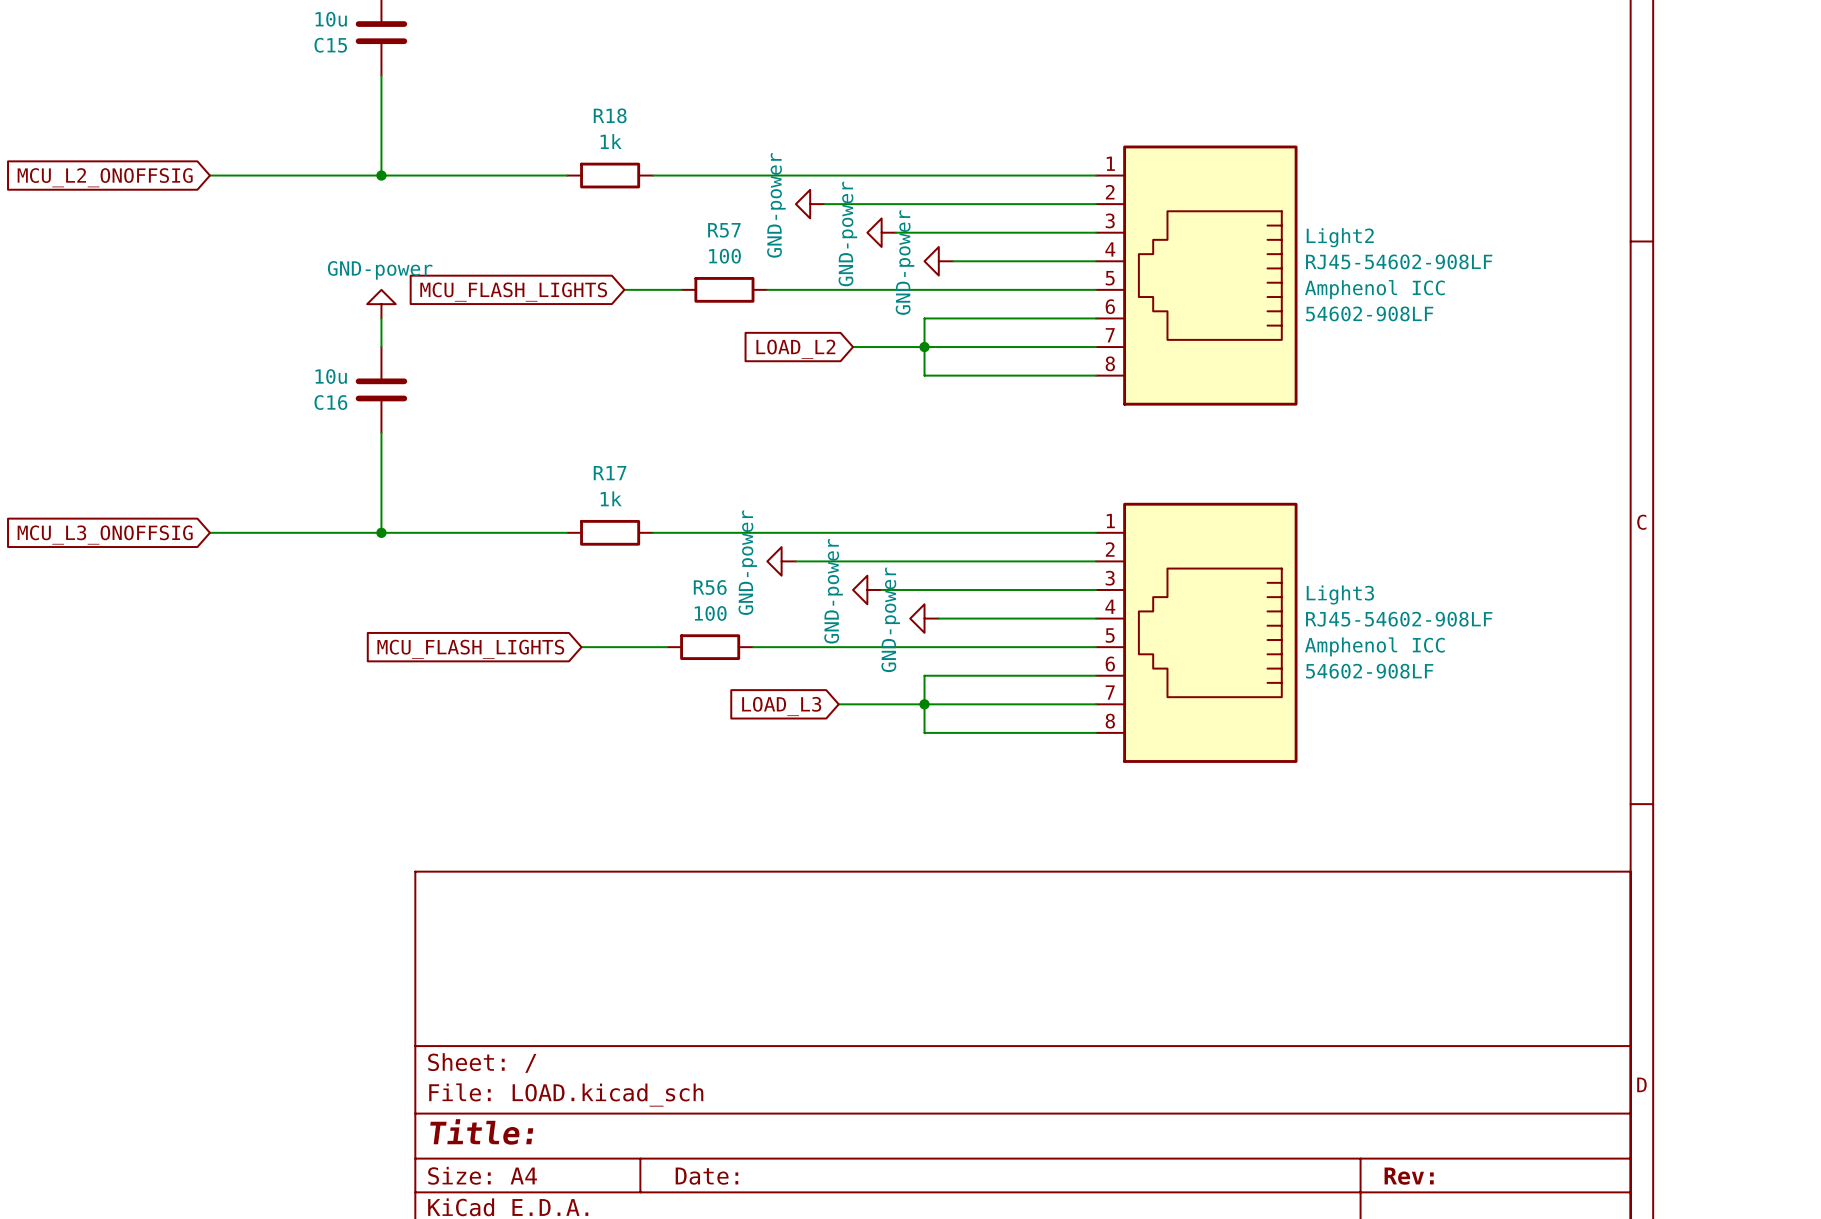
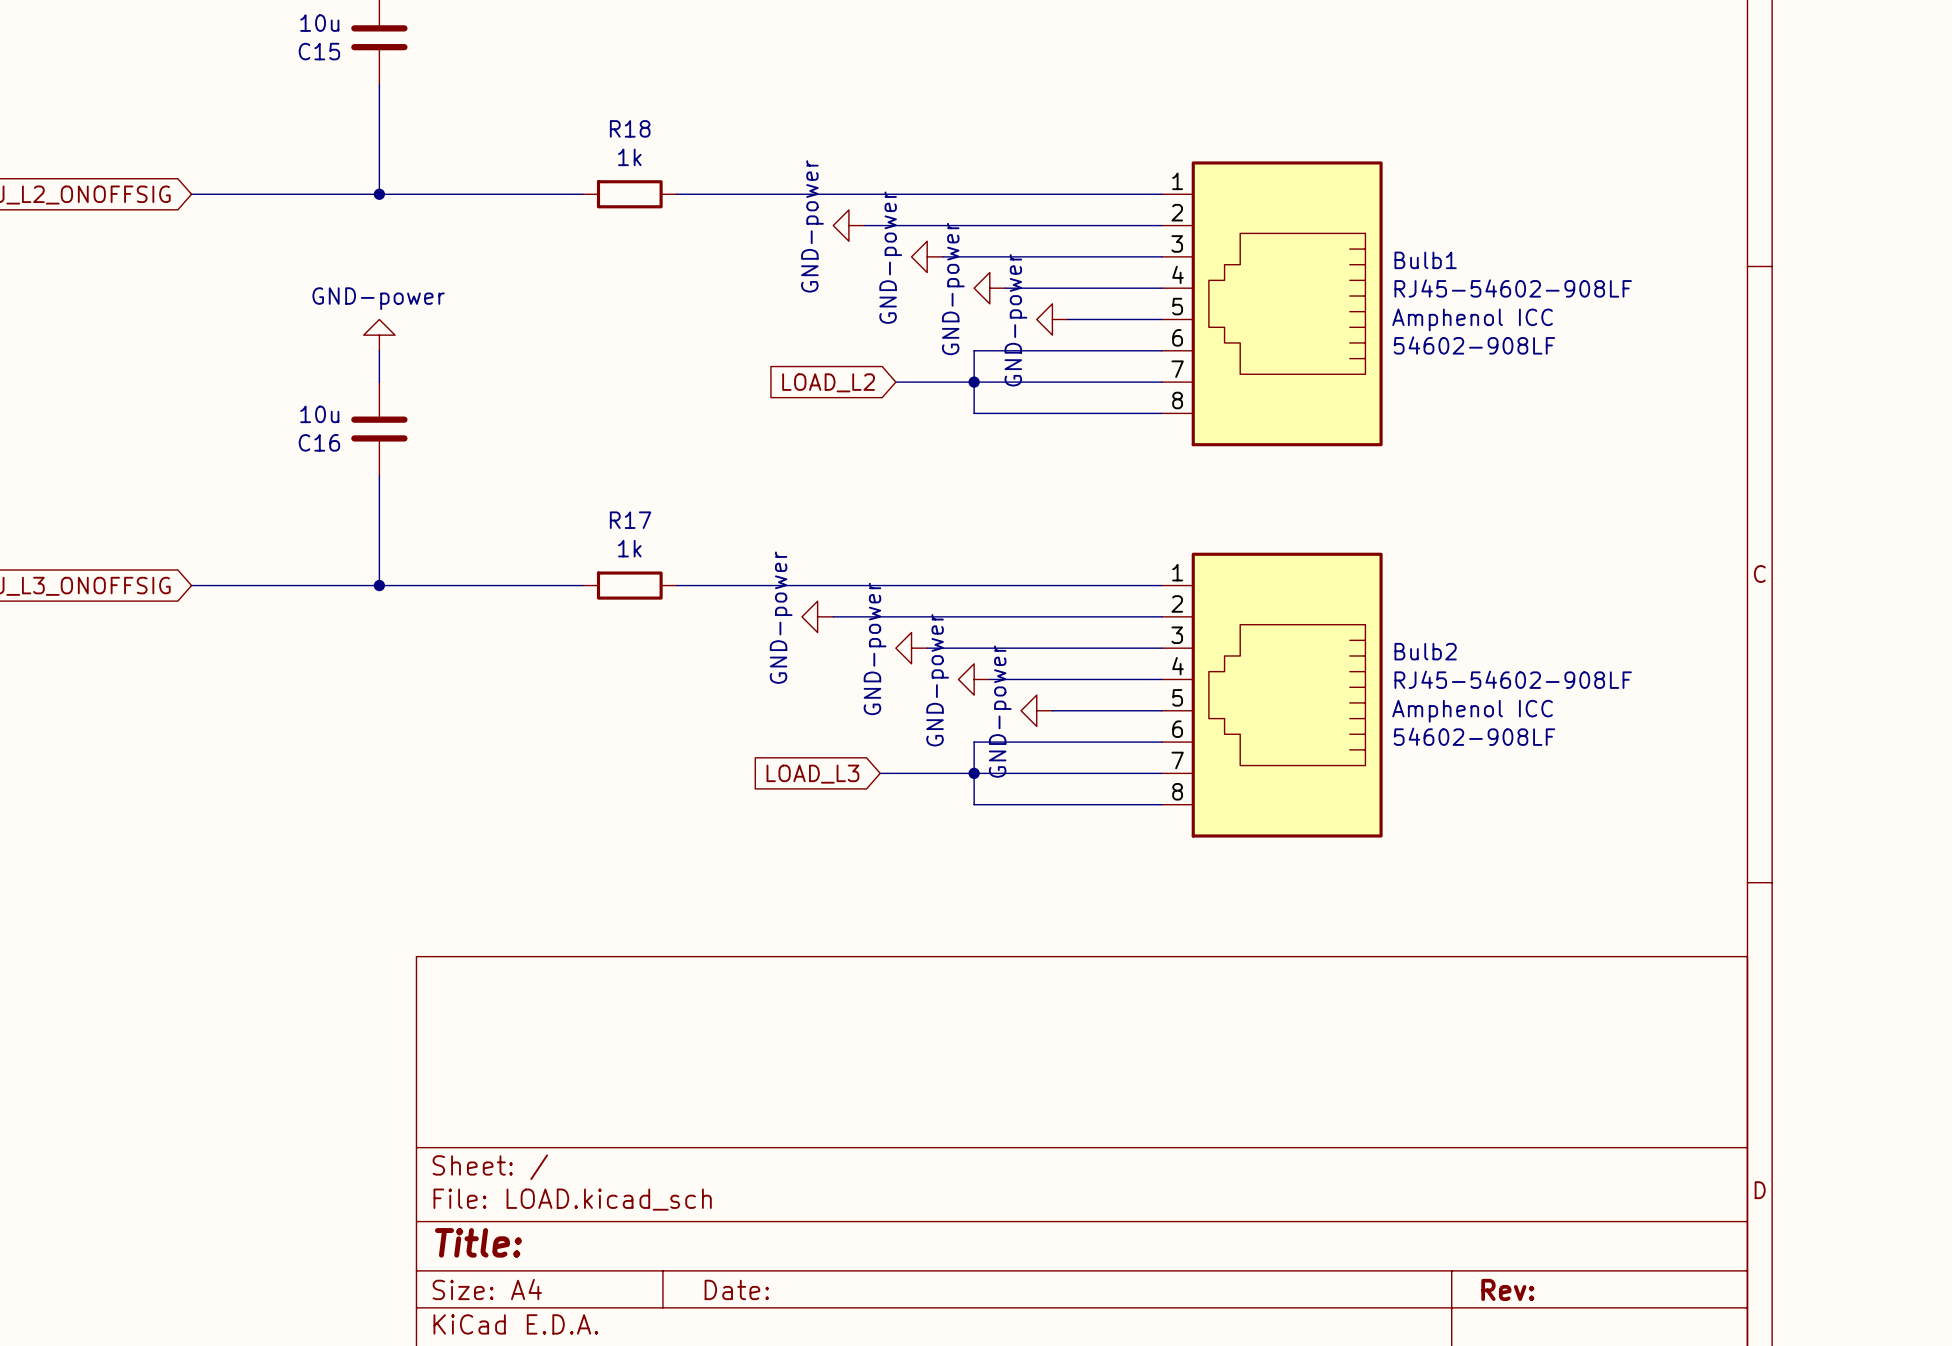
Light2 name: Light2 (1340, 237) -> Bulb1 (1425, 260)
wire: (624, 289) (681, 289) -> none
R57: 100 (724, 289) -> none
wire: (767, 289) (1010, 289) -> none
power symbol: none -> GND-power (1052, 319)
global label: MCU_FLASH_LIGHTS (513, 292) -> none
Light3 name: Light3 (1340, 594) -> Bulb2 (1425, 651)
wire: (581, 647) (667, 647) -> none
R56: 100 (710, 647) -> none
wire: (753, 647) (995, 647) -> none
power symbol: none -> GND-power (1036, 710)
global label: MCU_FLASH_LIGHTS (470, 649) -> none

